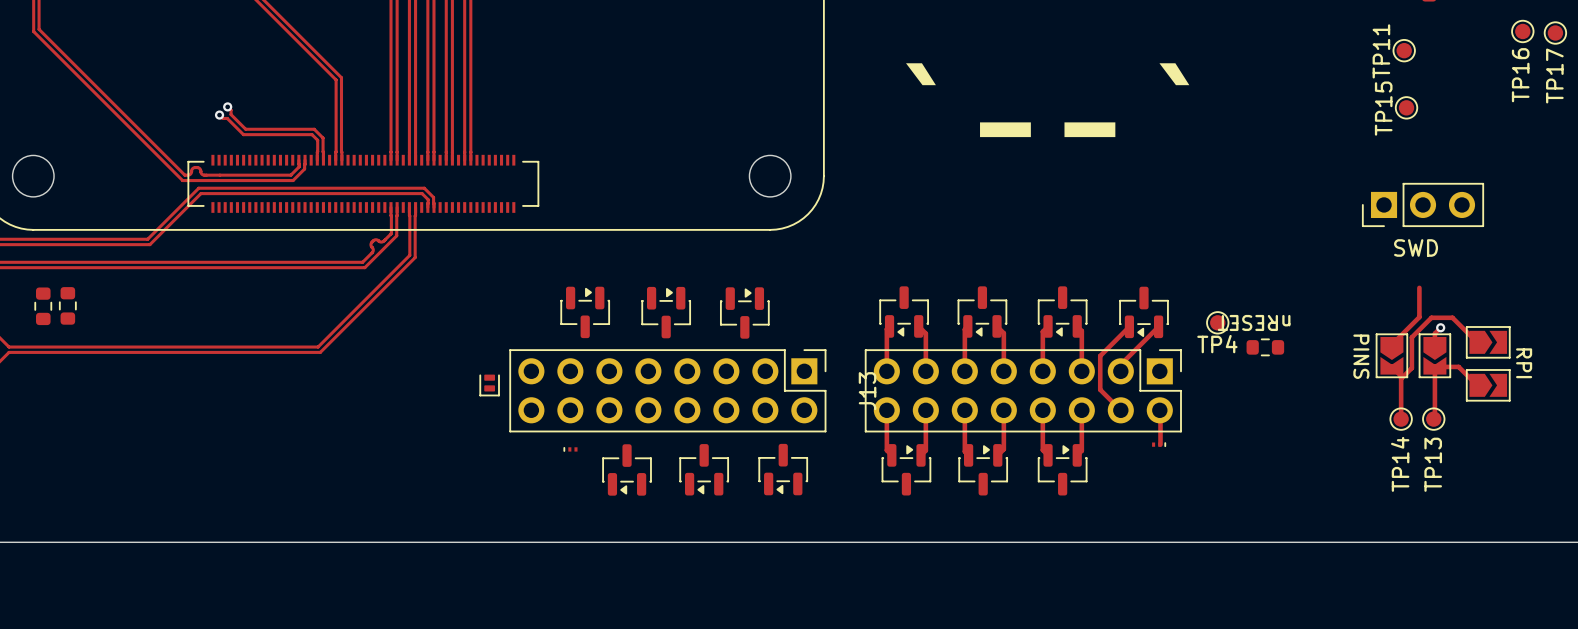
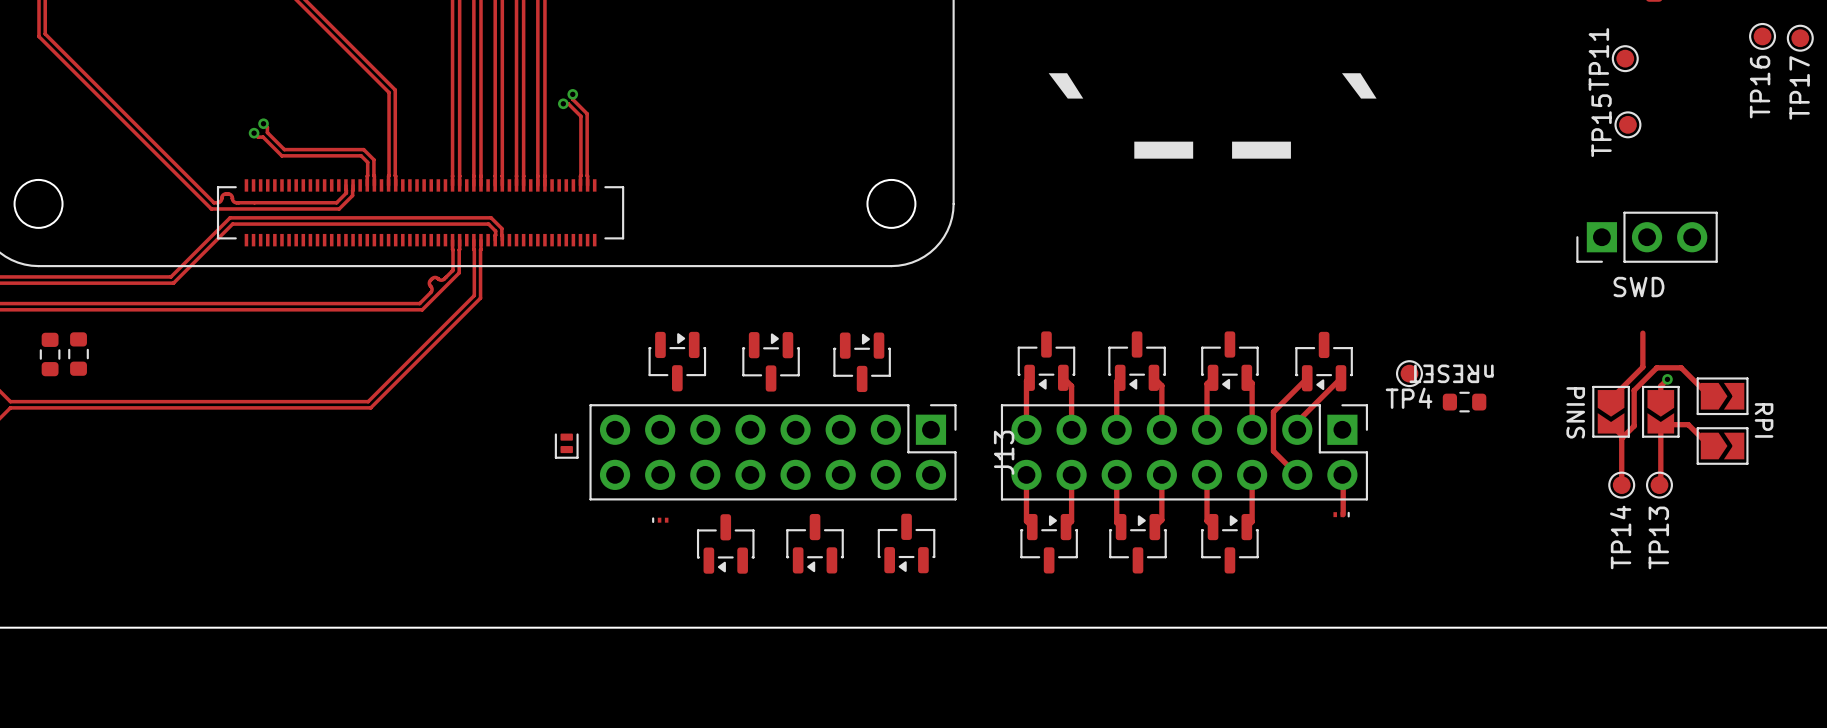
track: none -> (572, 94) (572, 99) (587, 113) (587, 185)
via: none -> (572, 94)
track: none -> (563, 103) (568, 103) (580, 116) (580, 185)
via: none -> (563, 103)

